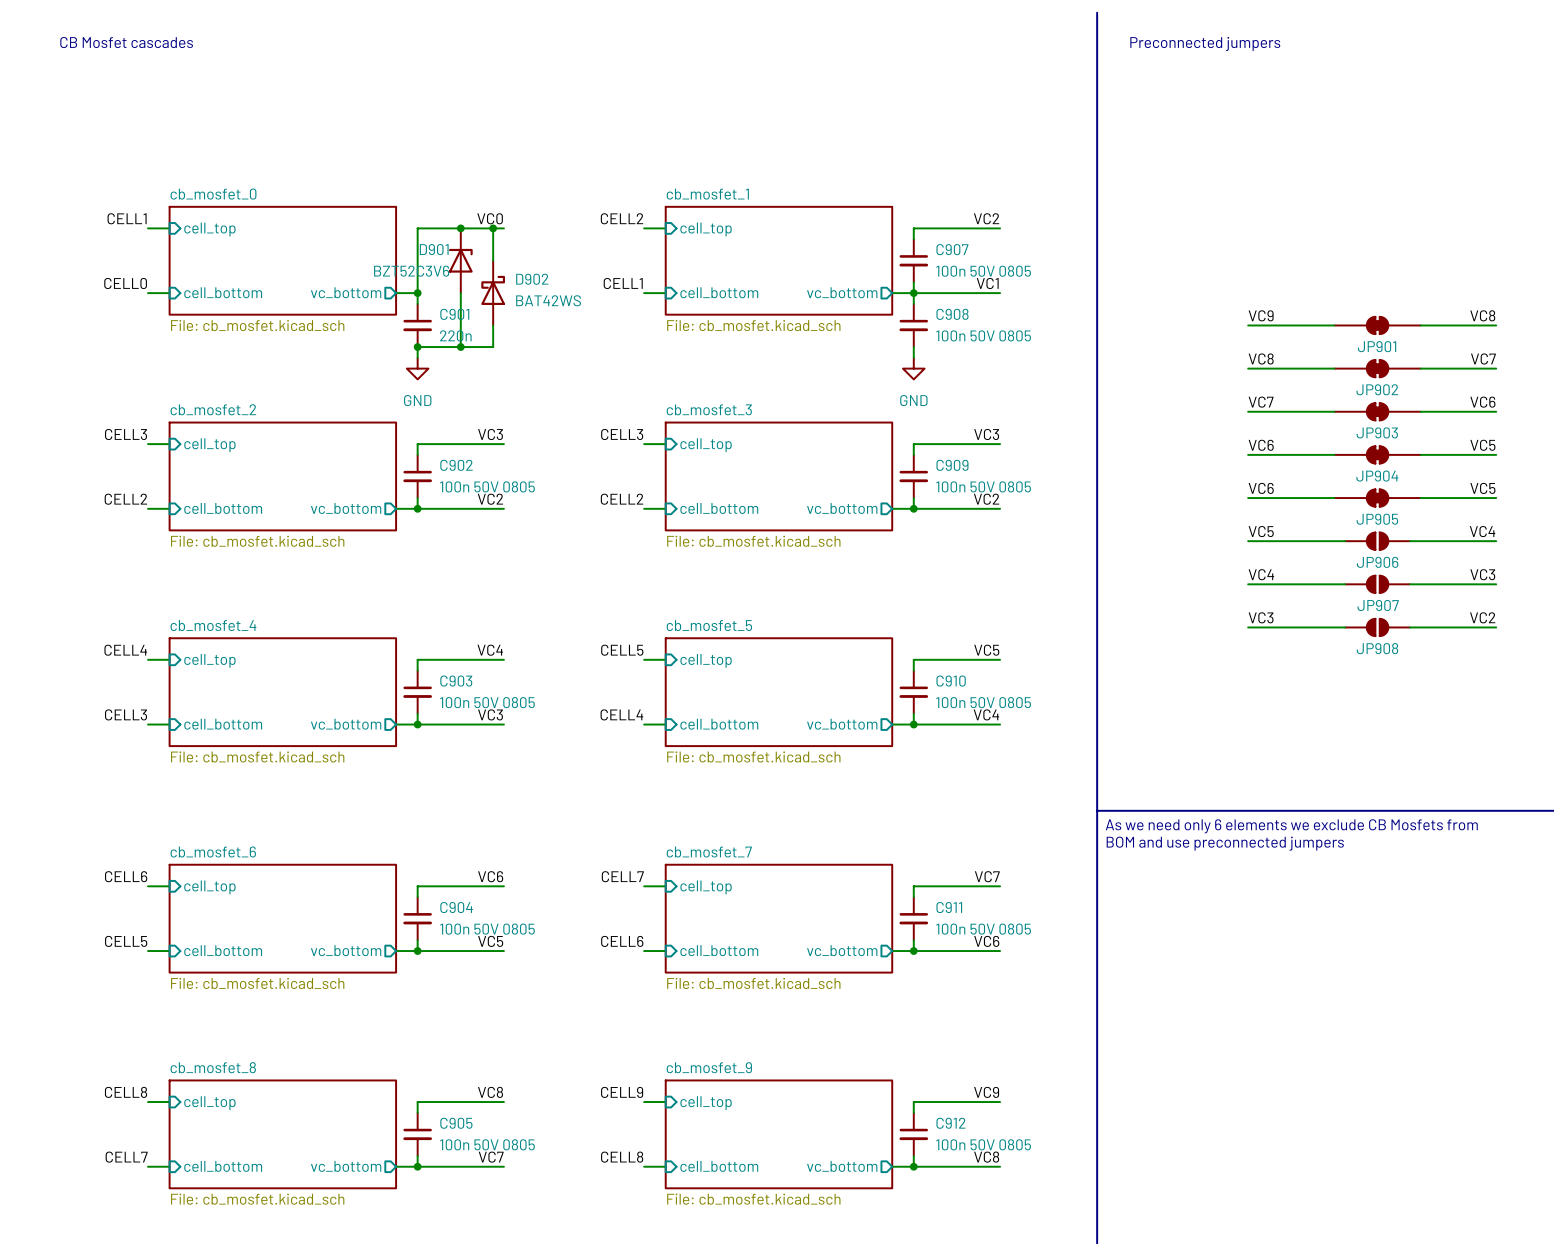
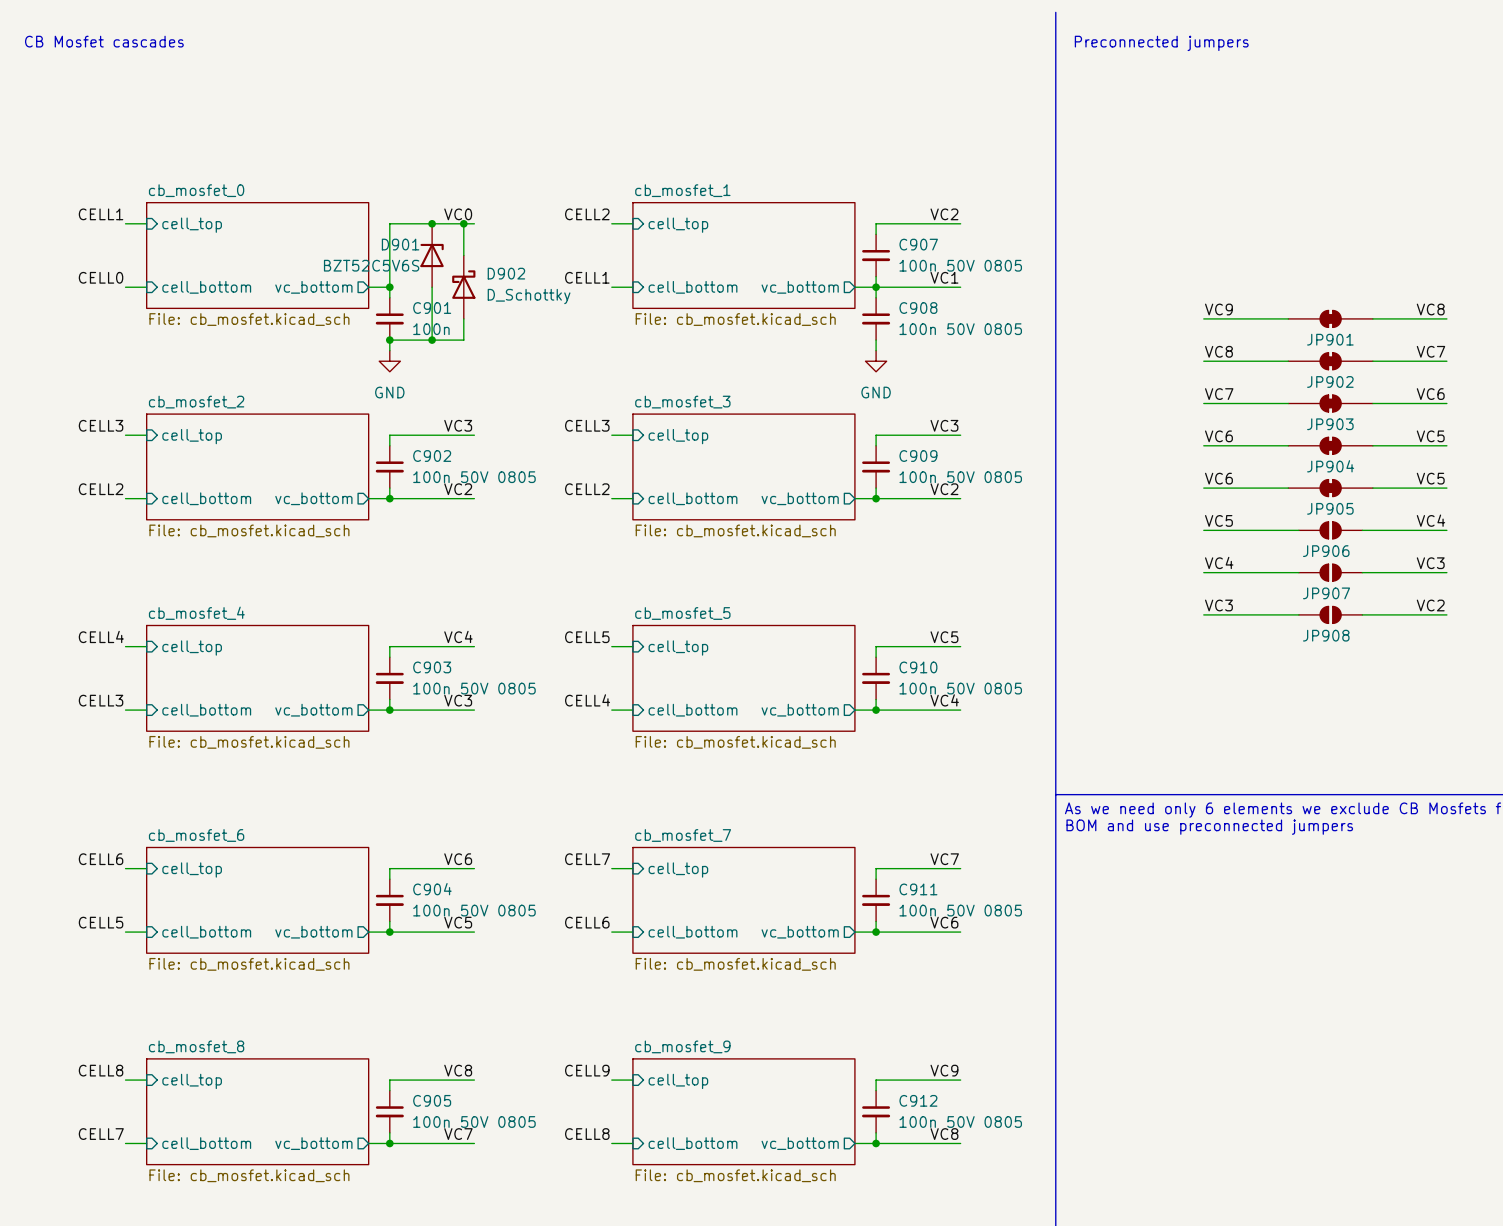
D901 value: BZT52C3V6 (411, 271) -> BZT52C5V6S (371, 265)
D902 value: BAT42WS (548, 300) -> D_Schottky (529, 296)
C901 value: 220n (455, 335) -> 100n (431, 329)

